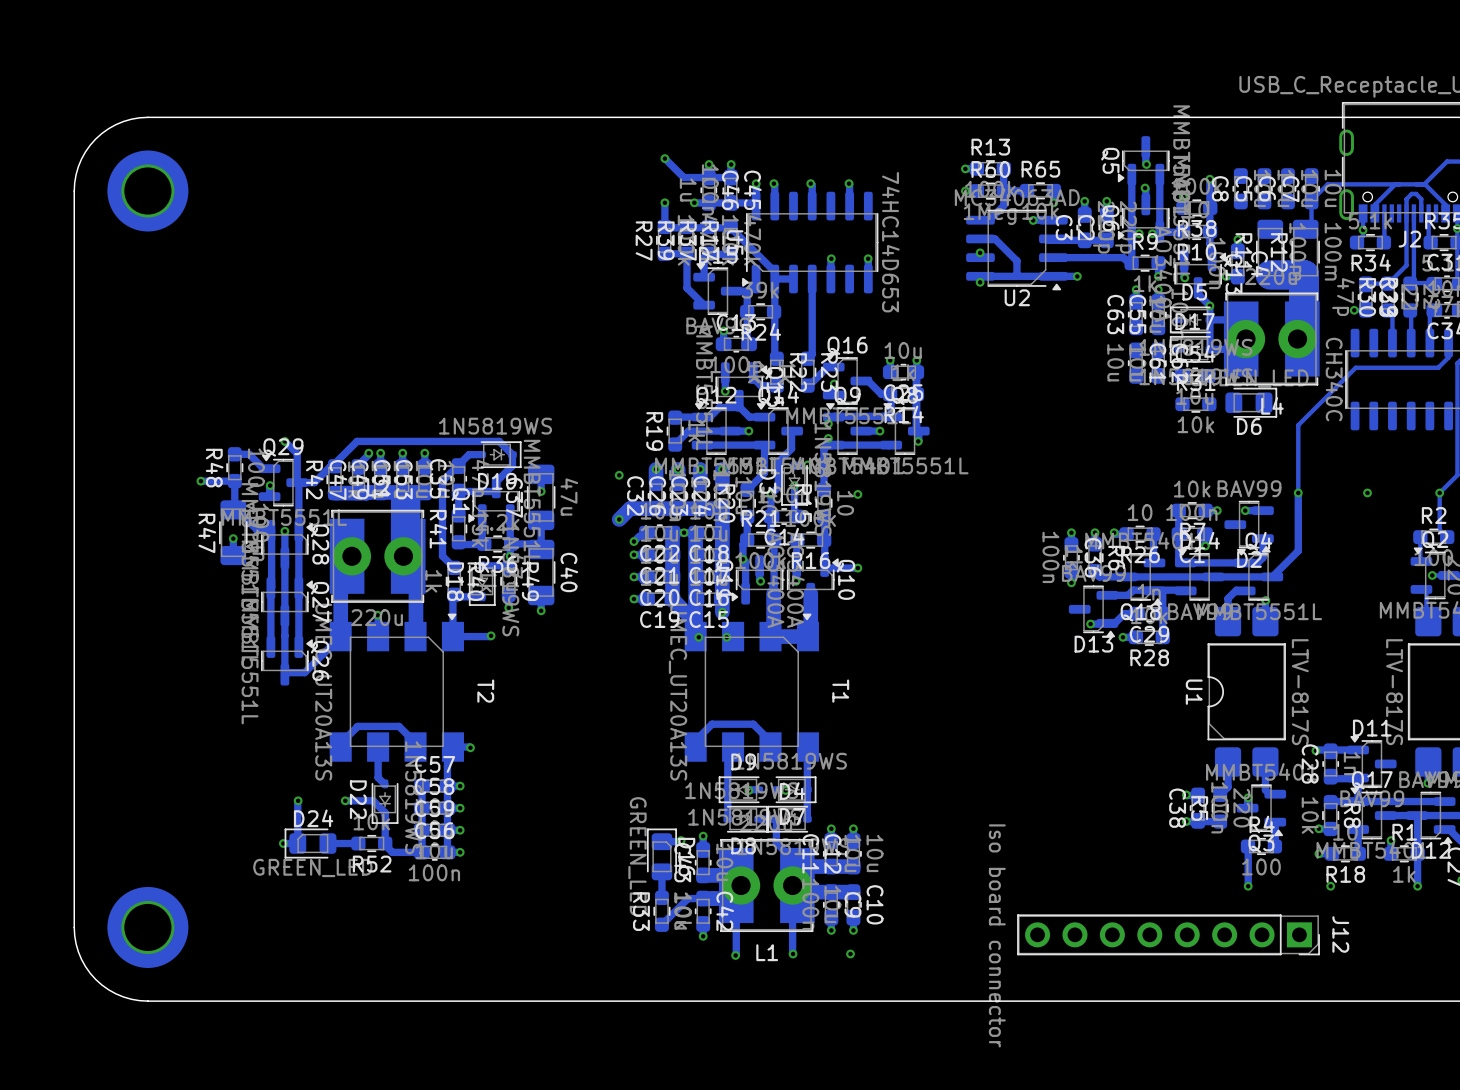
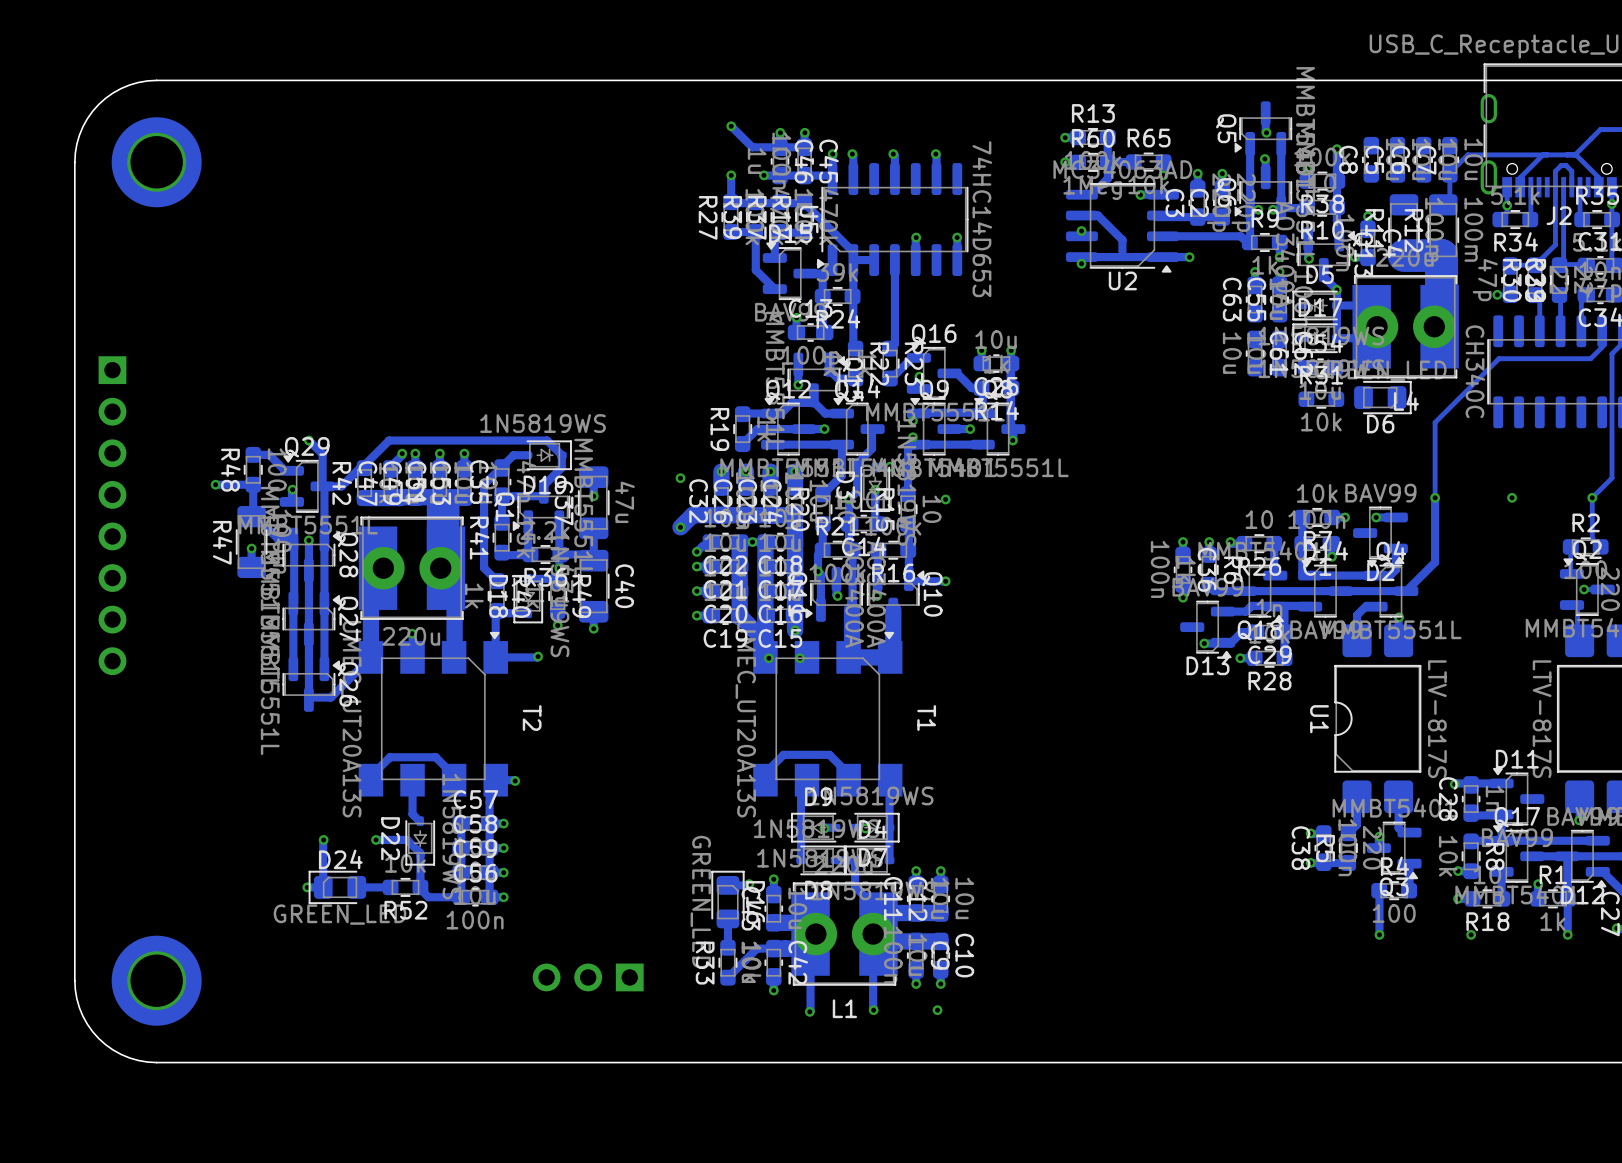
part: none -> (112, 515)
part: none -> (588, 977)
J12: Iso board connector (1168, 934) -> none

